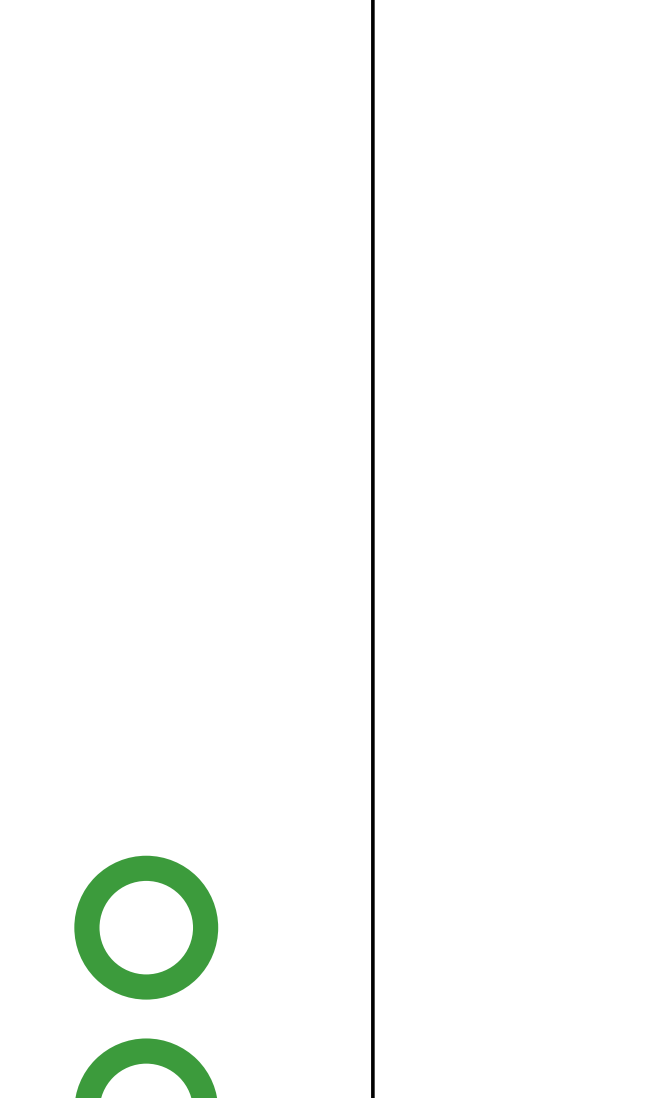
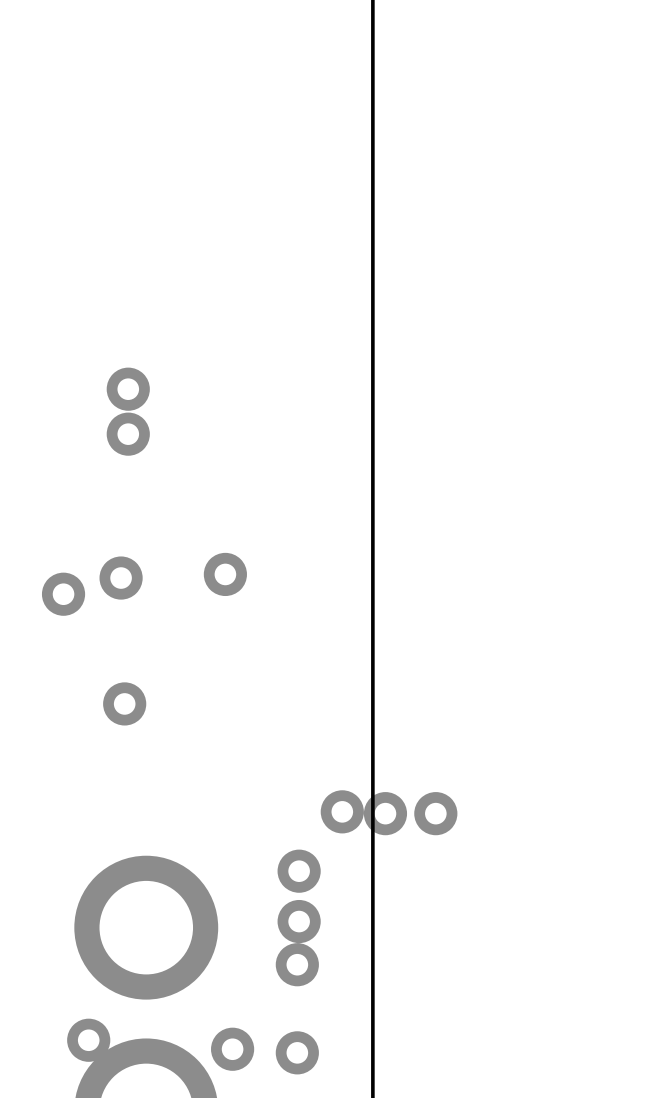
via: none -> (128, 389)
via: none -> (128, 434)
via: none -> (225, 574)
via: none -> (121, 578)
via: none -> (63, 594)
via: none -> (124, 703)
via: none -> (342, 811)
via: none -> (385, 813)
via: none -> (435, 813)
via: none -> (299, 871)
via: none -> (299, 921)
via: none -> (297, 964)
via: none -> (88, 1040)
via: none -> (232, 1049)
via: none -> (297, 1052)

